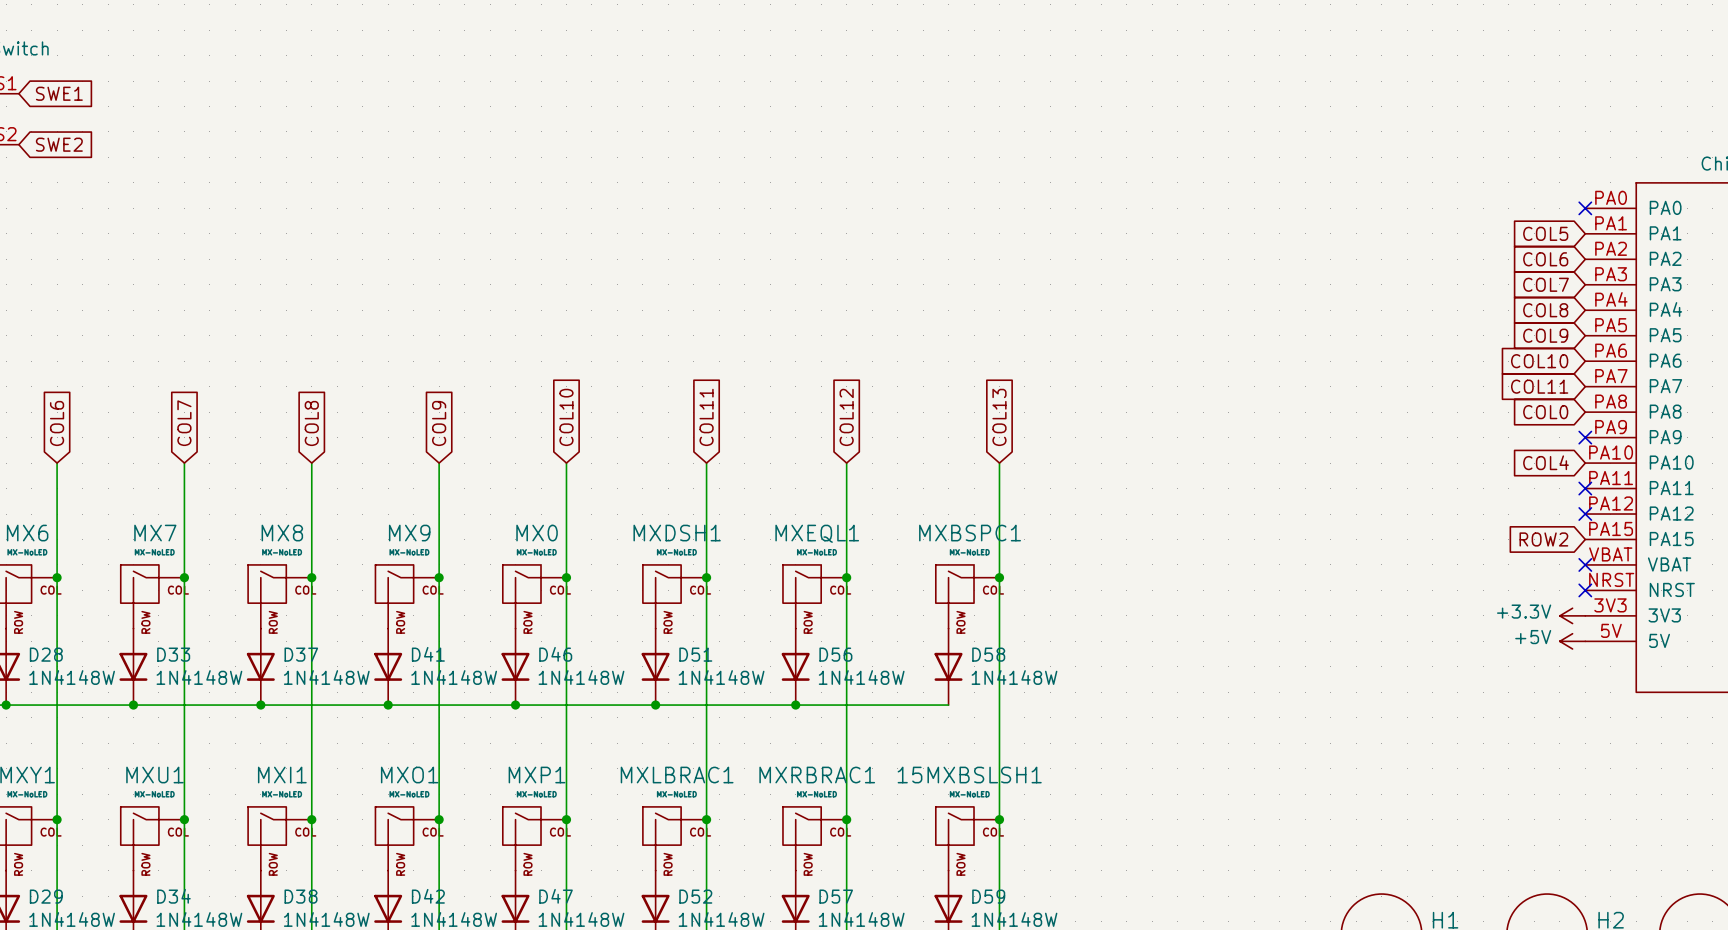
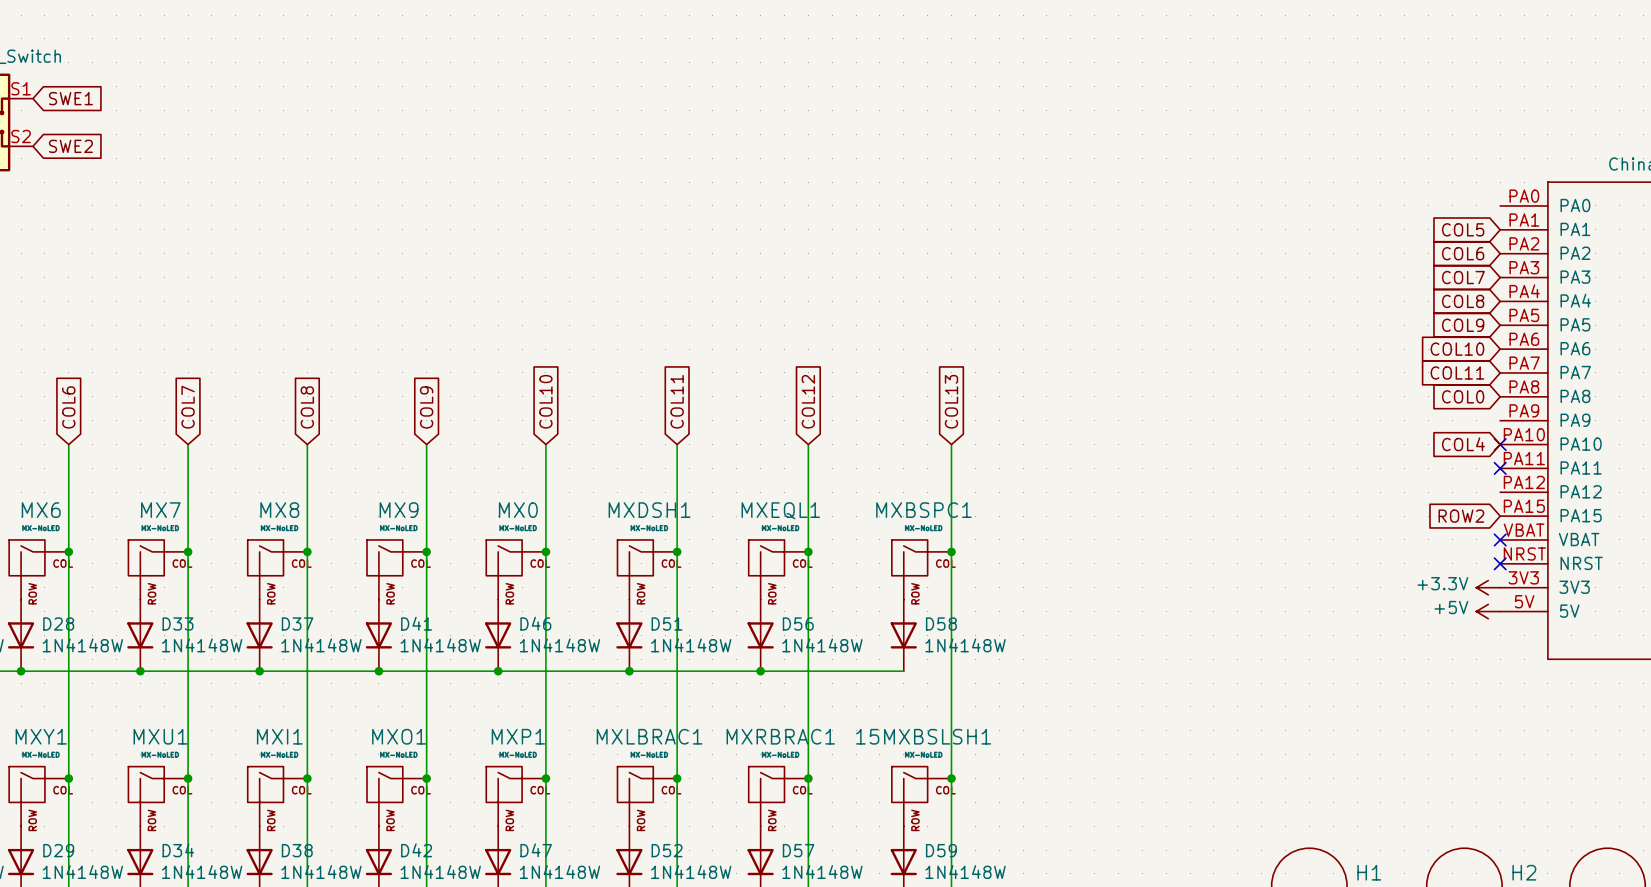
no-connect mark: (1585, 208) -> none
no-connect mark: (1585, 437) -> none
no-connect mark: none -> (1500, 444)
no-connect mark: (1585, 514) -> none

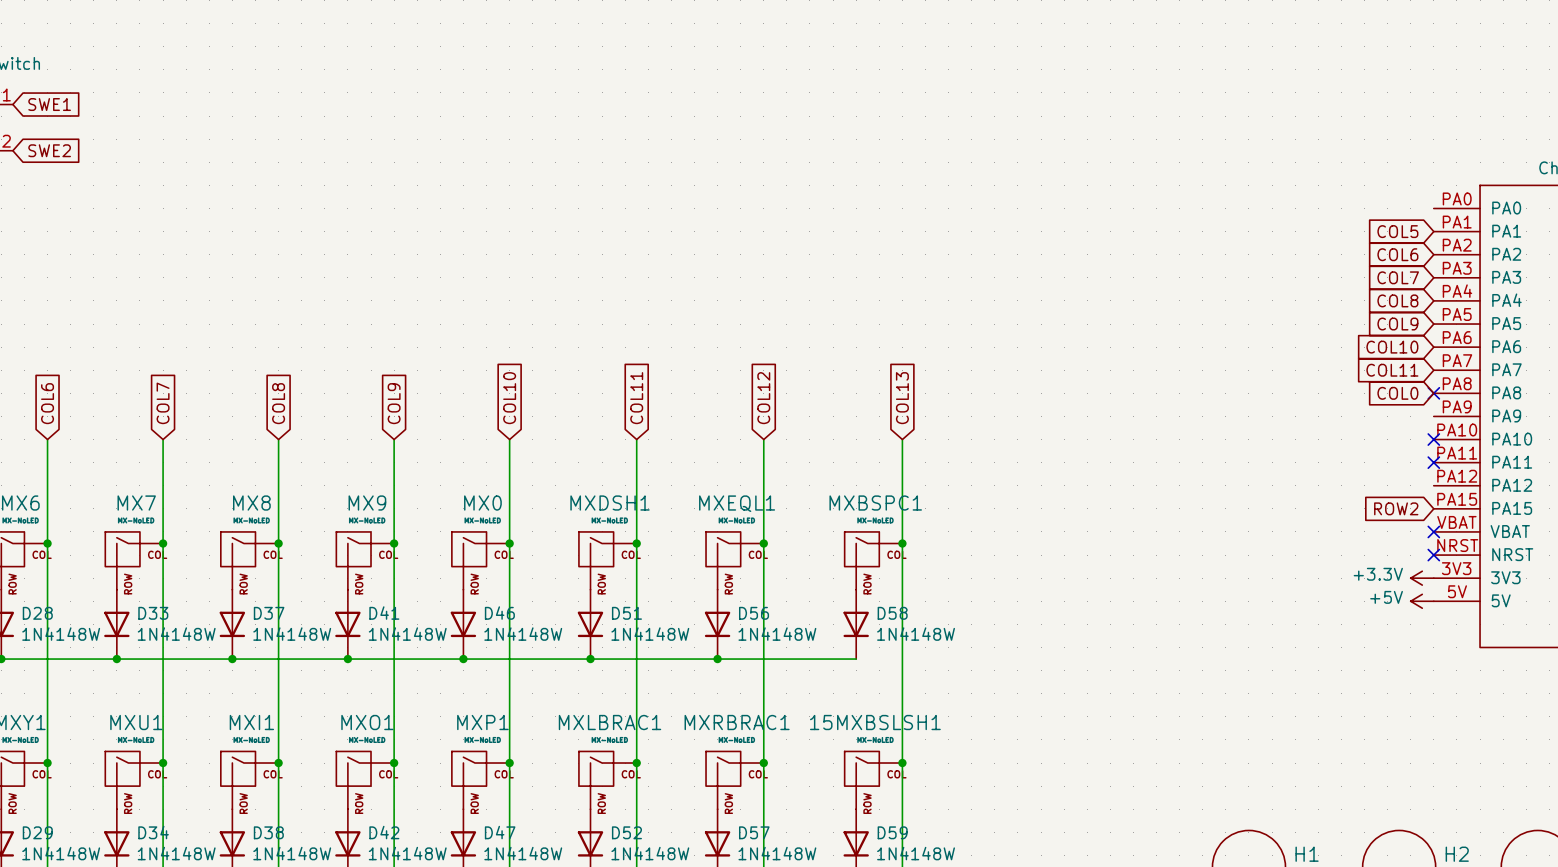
no-connect mark: none -> (1433, 393)
global label: COL4 (1463, 444) -> none

